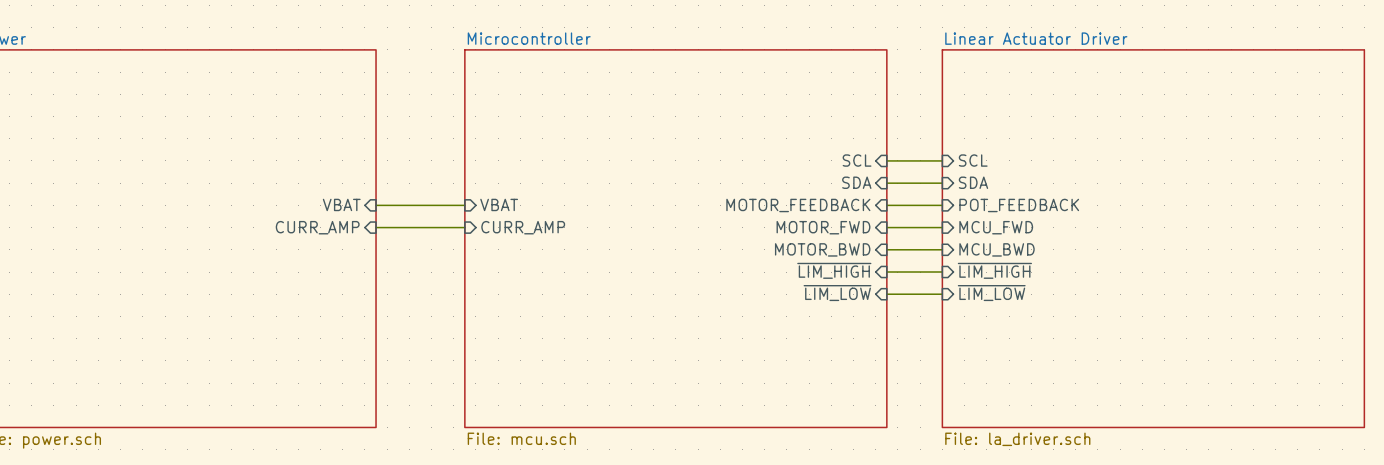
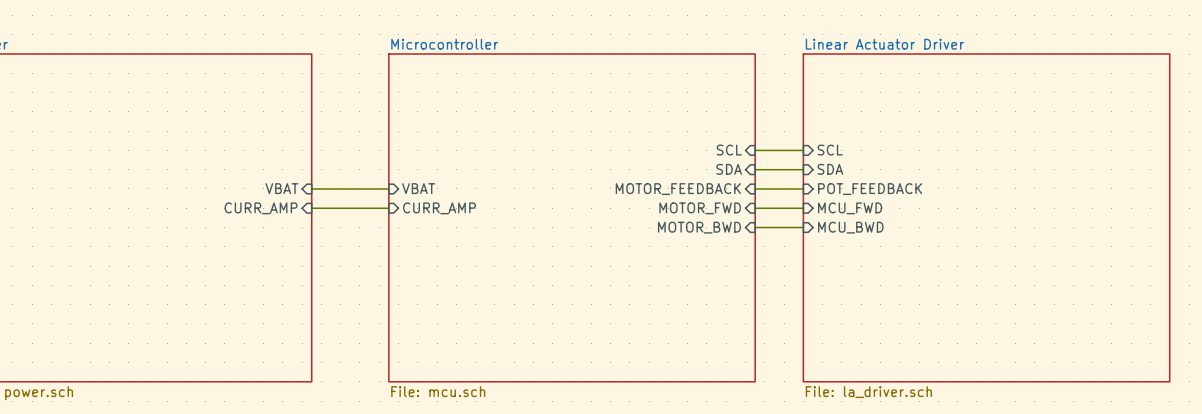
sheet pin: ~{LIM_HIGH} (834, 270) -> none
sheet pin: ~{LIM_HIGH} (994, 270) -> none
wire: (886, 272) (942, 272) -> none
sheet pin: ~{LIM_LOW} (837, 293) -> none
sheet pin: ~{LIM_LOW} (991, 293) -> none
wire: (886, 294) (942, 294) -> none

